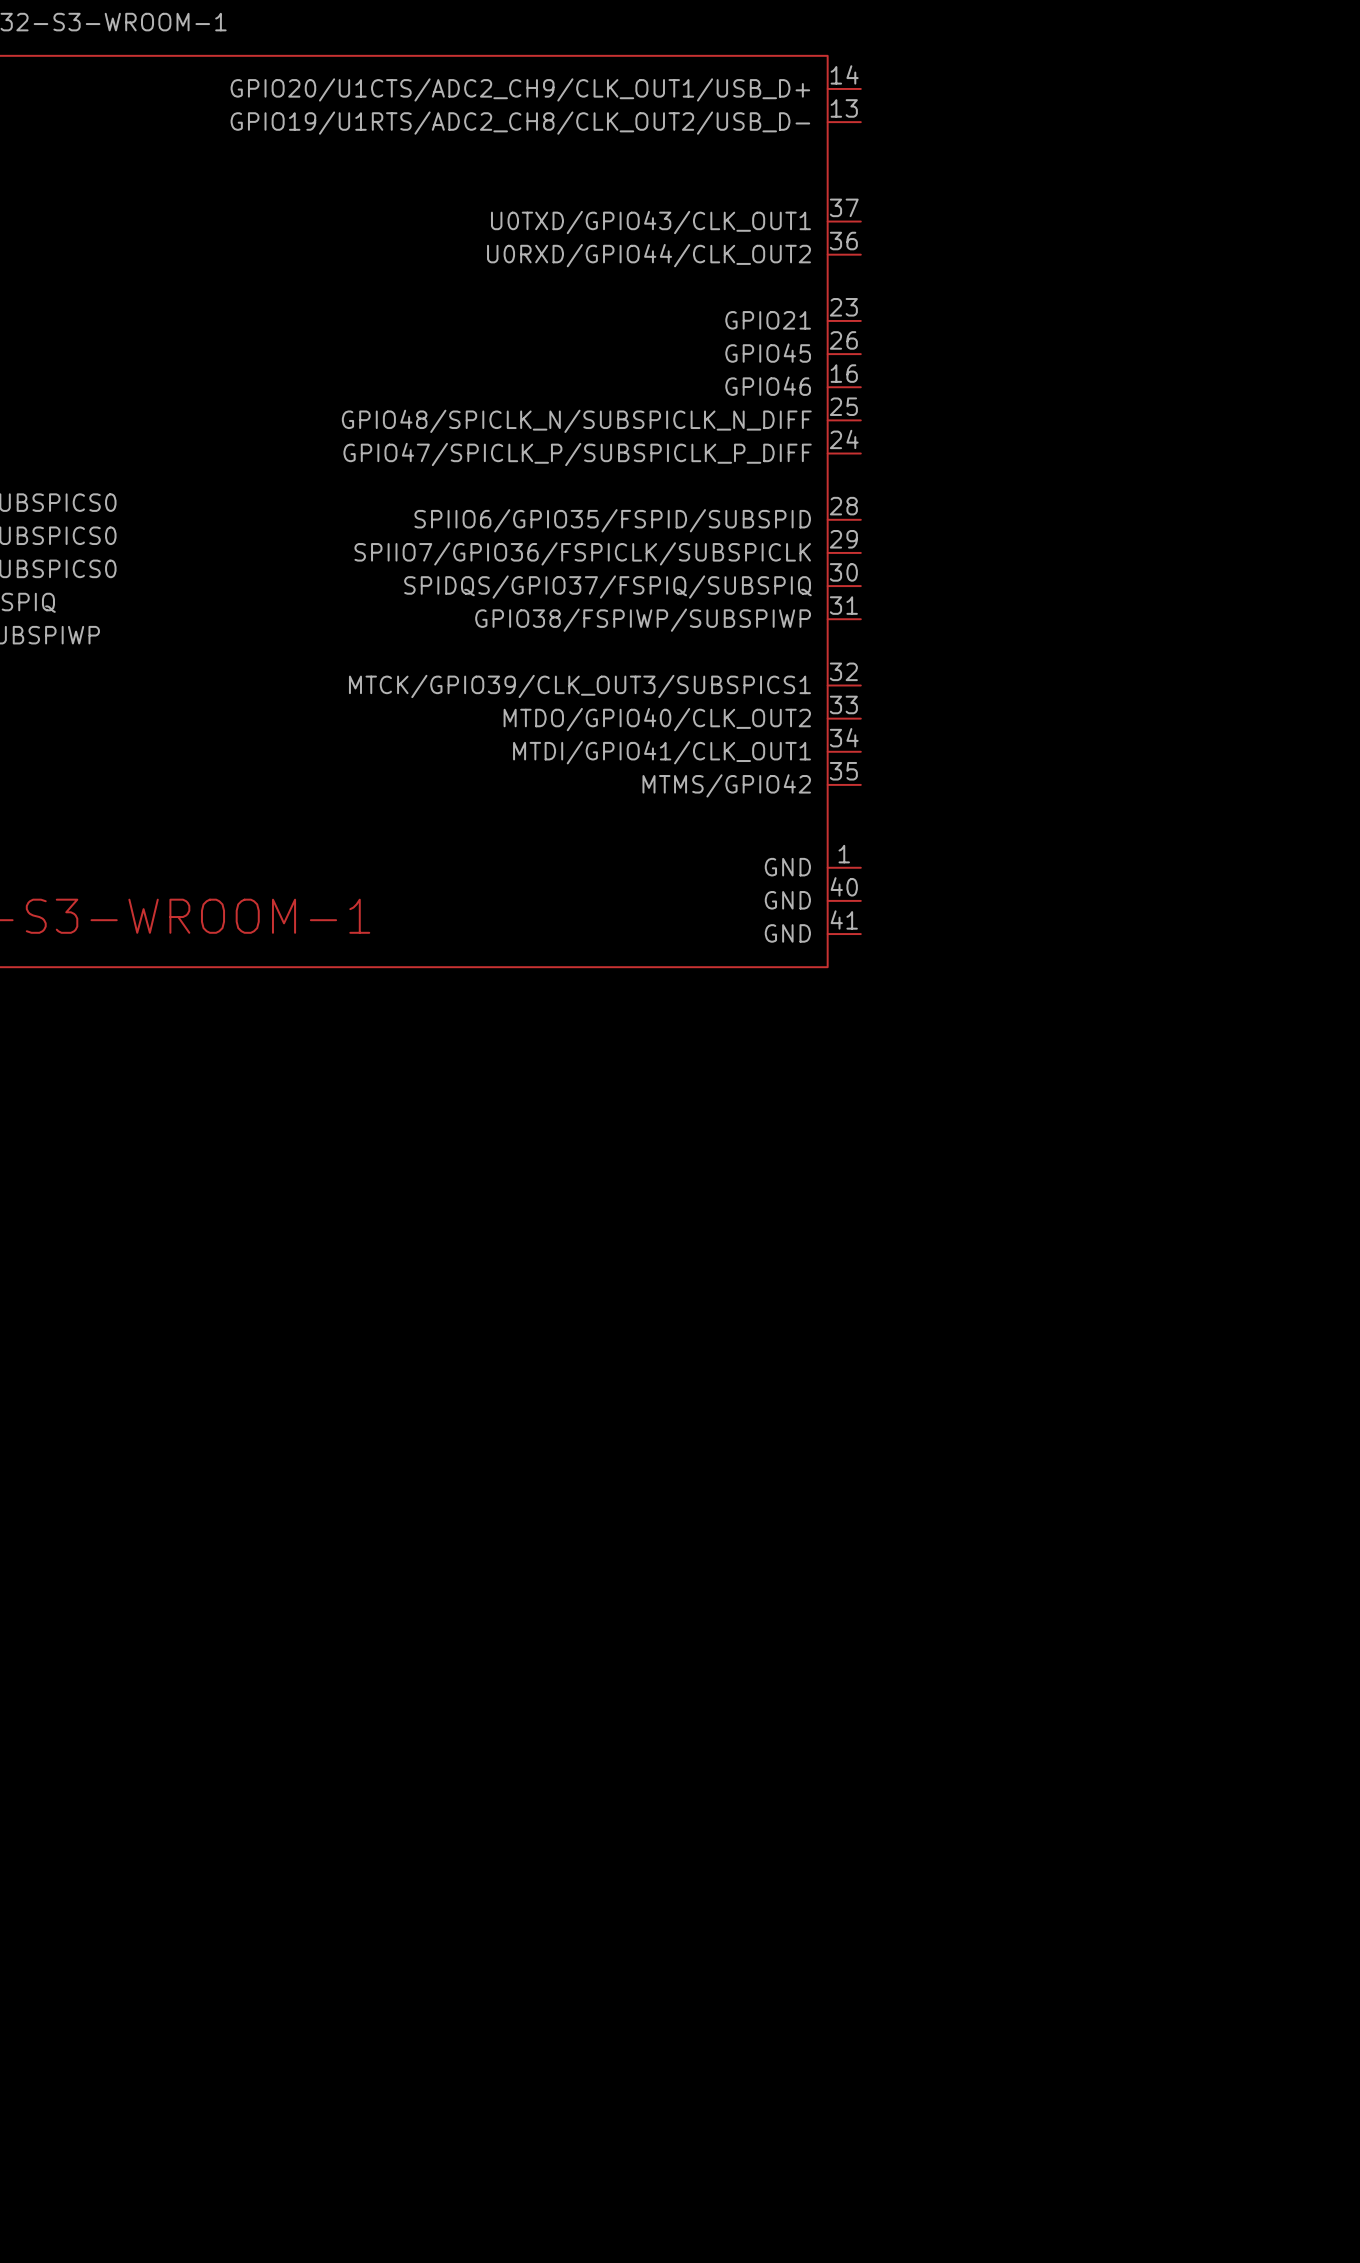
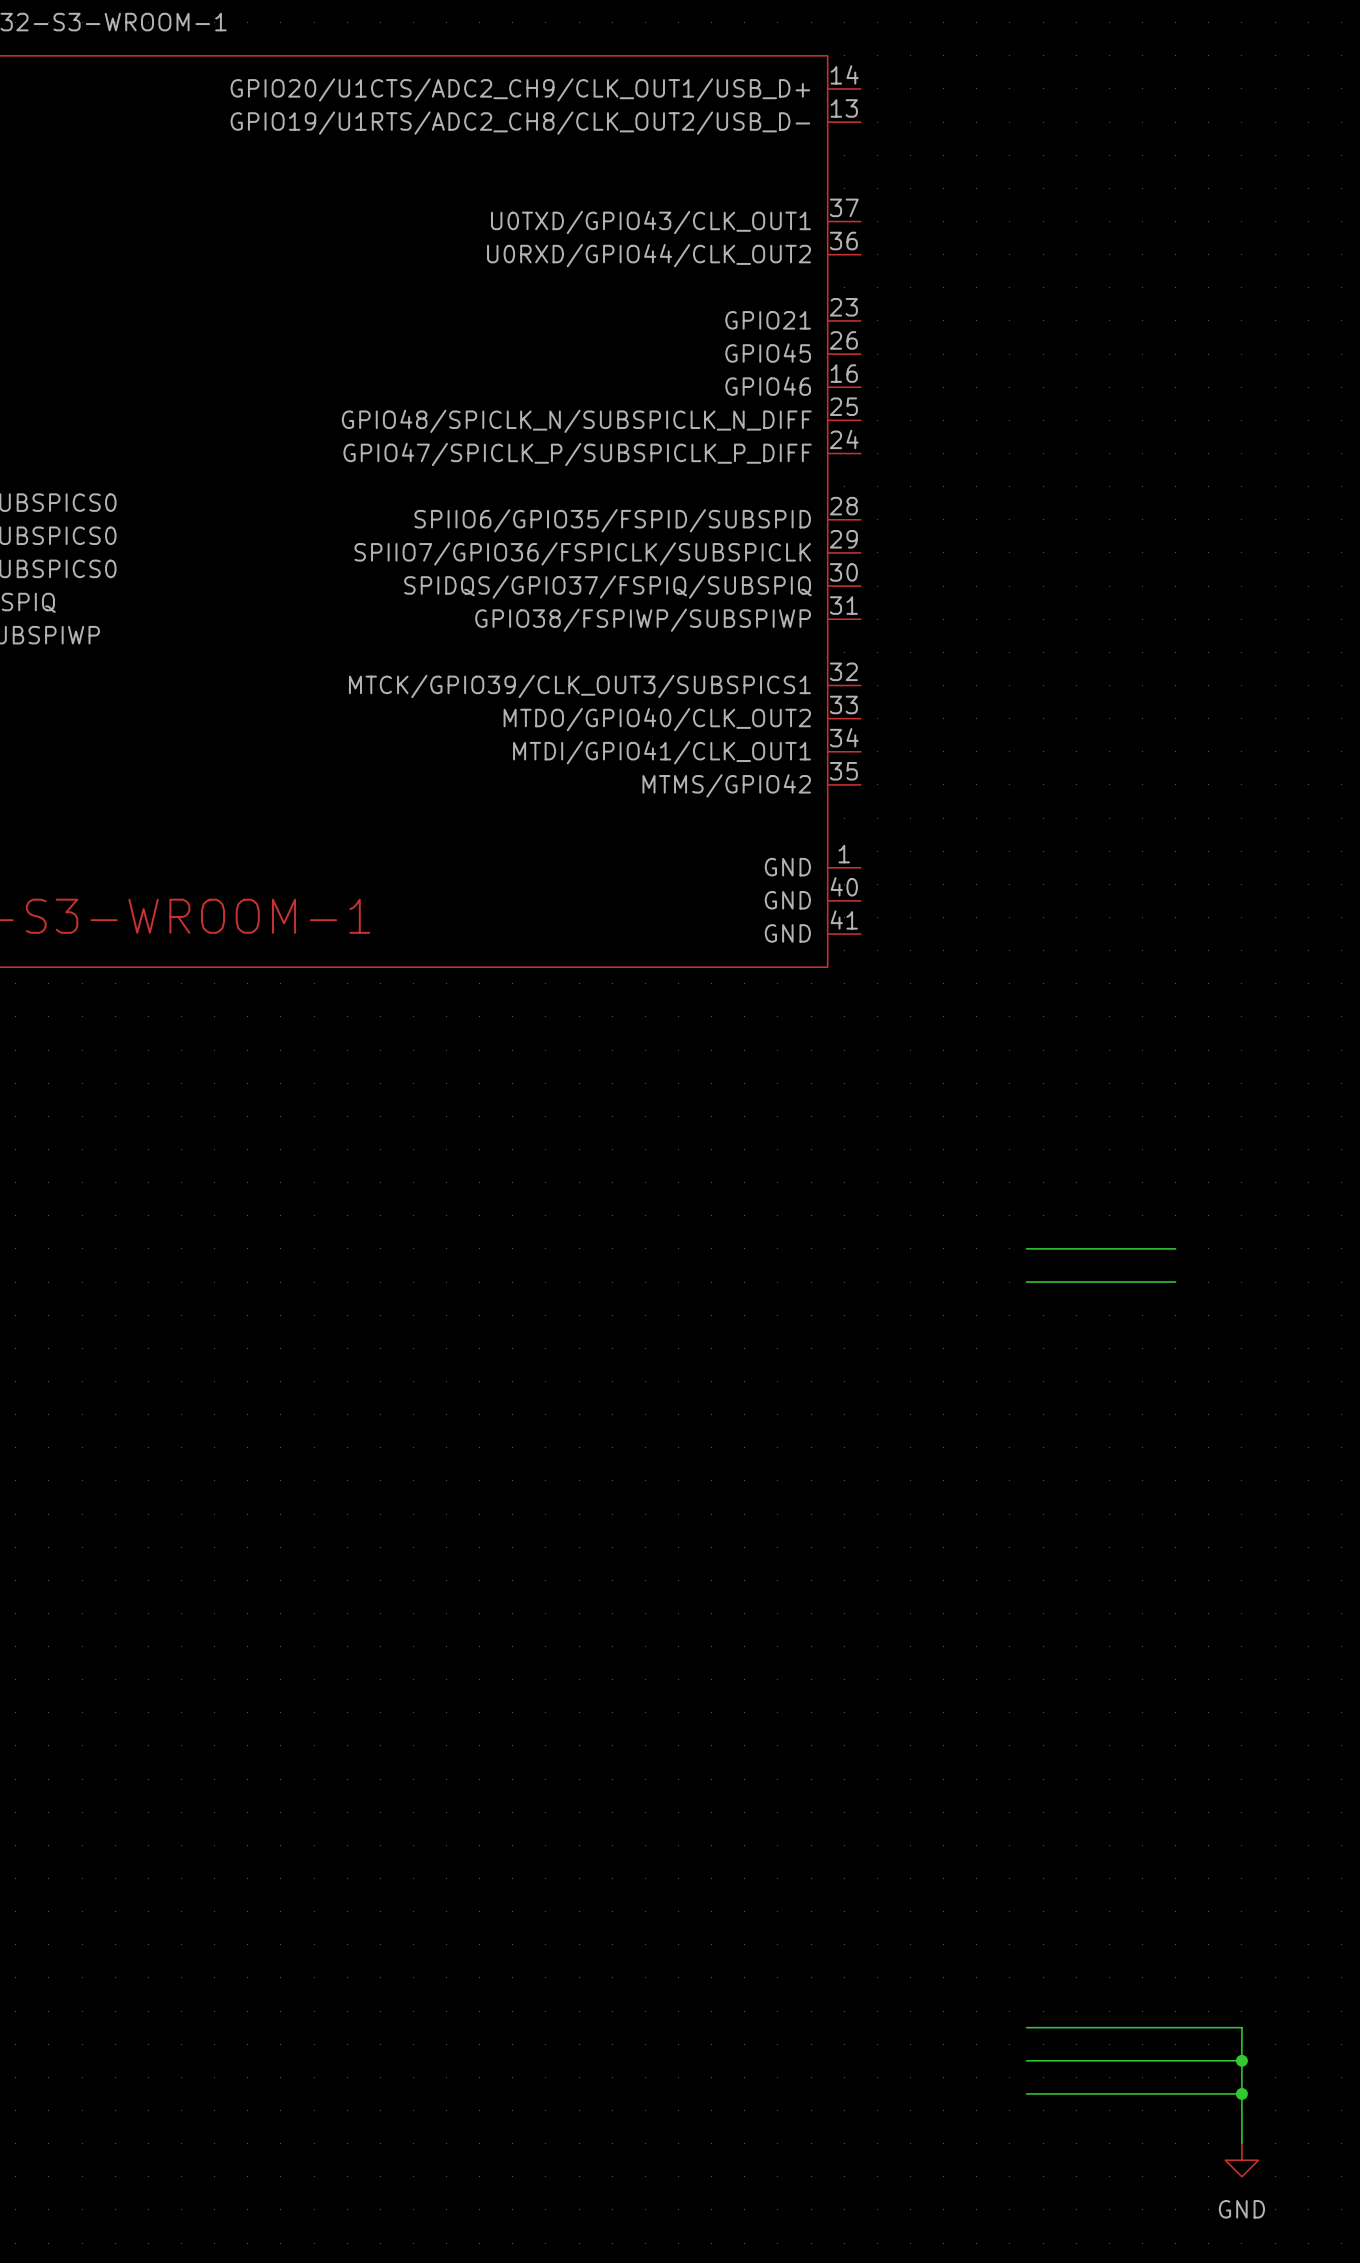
wire: none -> (1026, 1248) (1175, 1248)
wire: none -> (1026, 1282) (1175, 1282)
wire: none -> (1026, 2027) (1241, 2027) (1241, 2143)
wire: none -> (1026, 2060) (1241, 2060)
junction: none -> (1241, 2060)
wire: none -> (1026, 2093) (1241, 2093)
junction: none -> (1241, 2093)
power symbol: none -> GND (1241, 2160)

